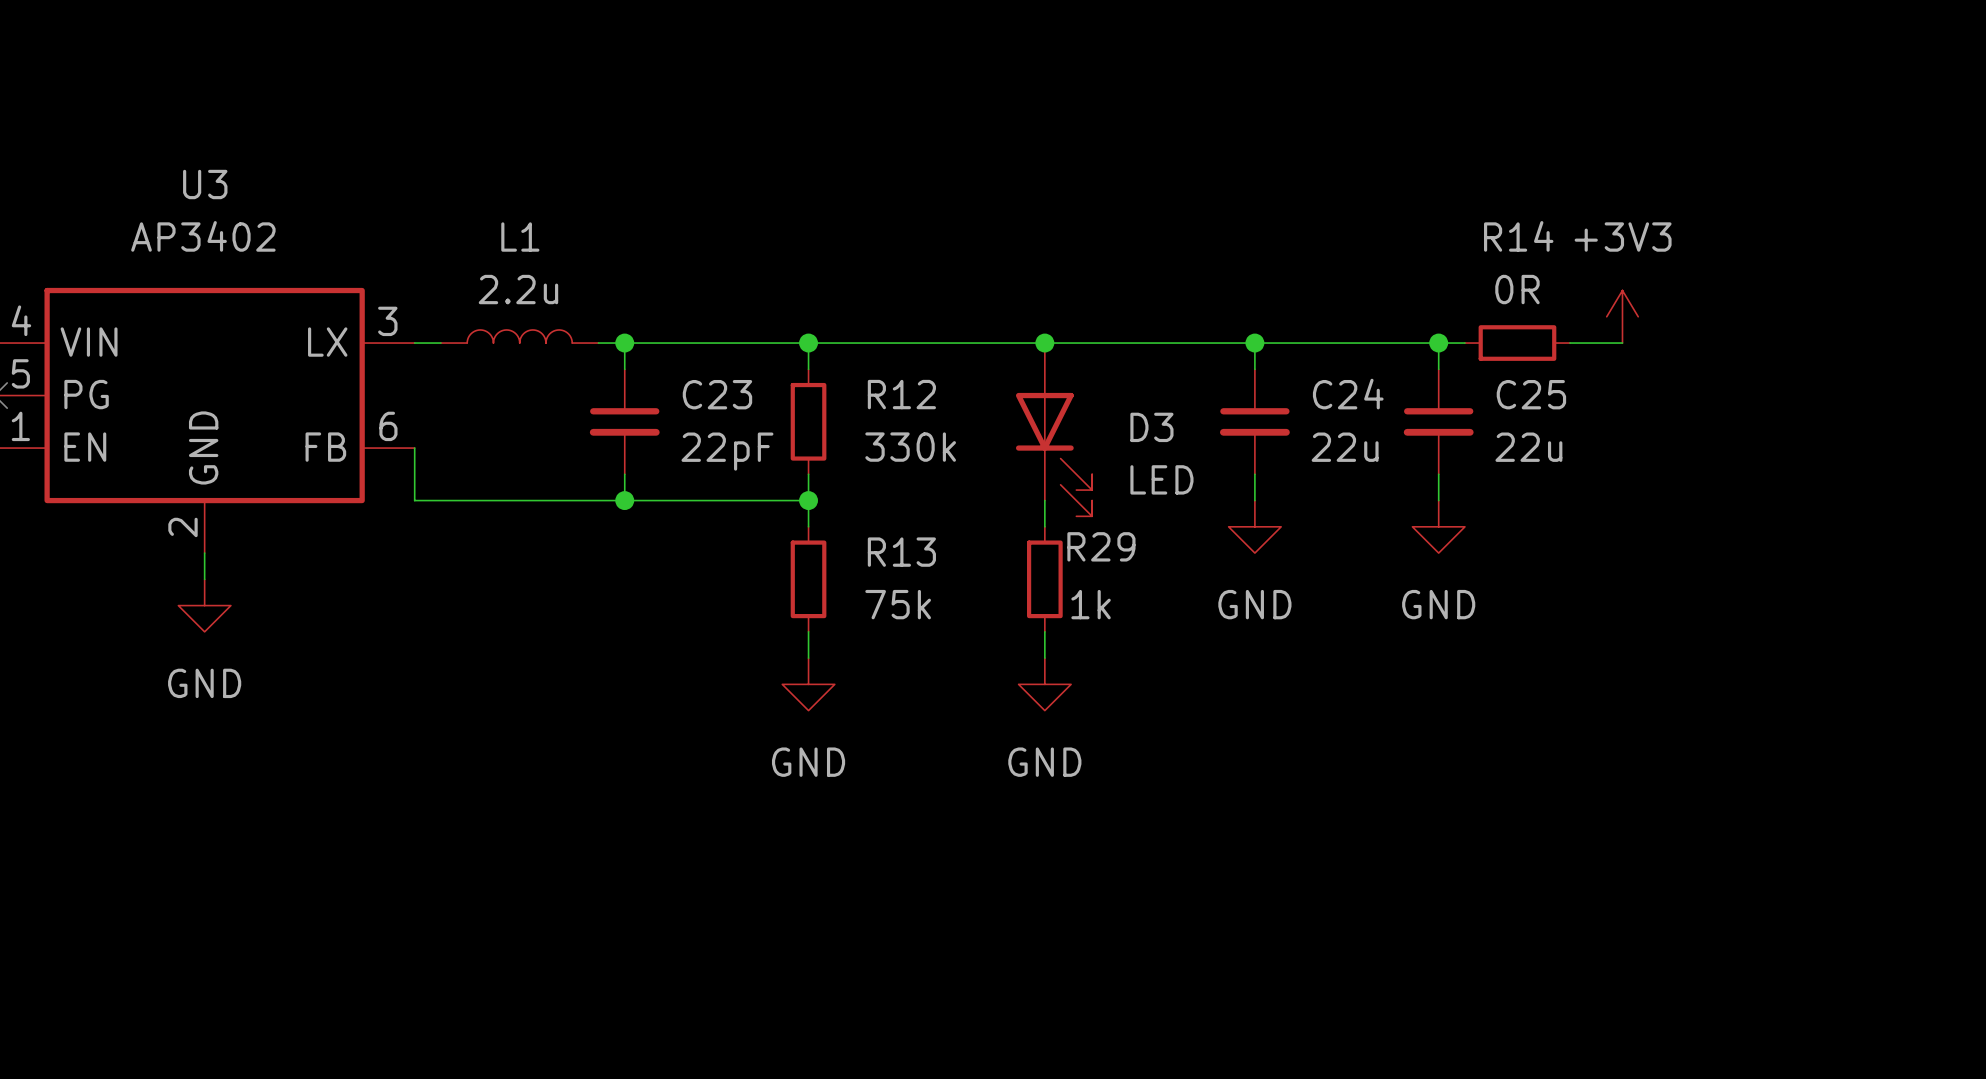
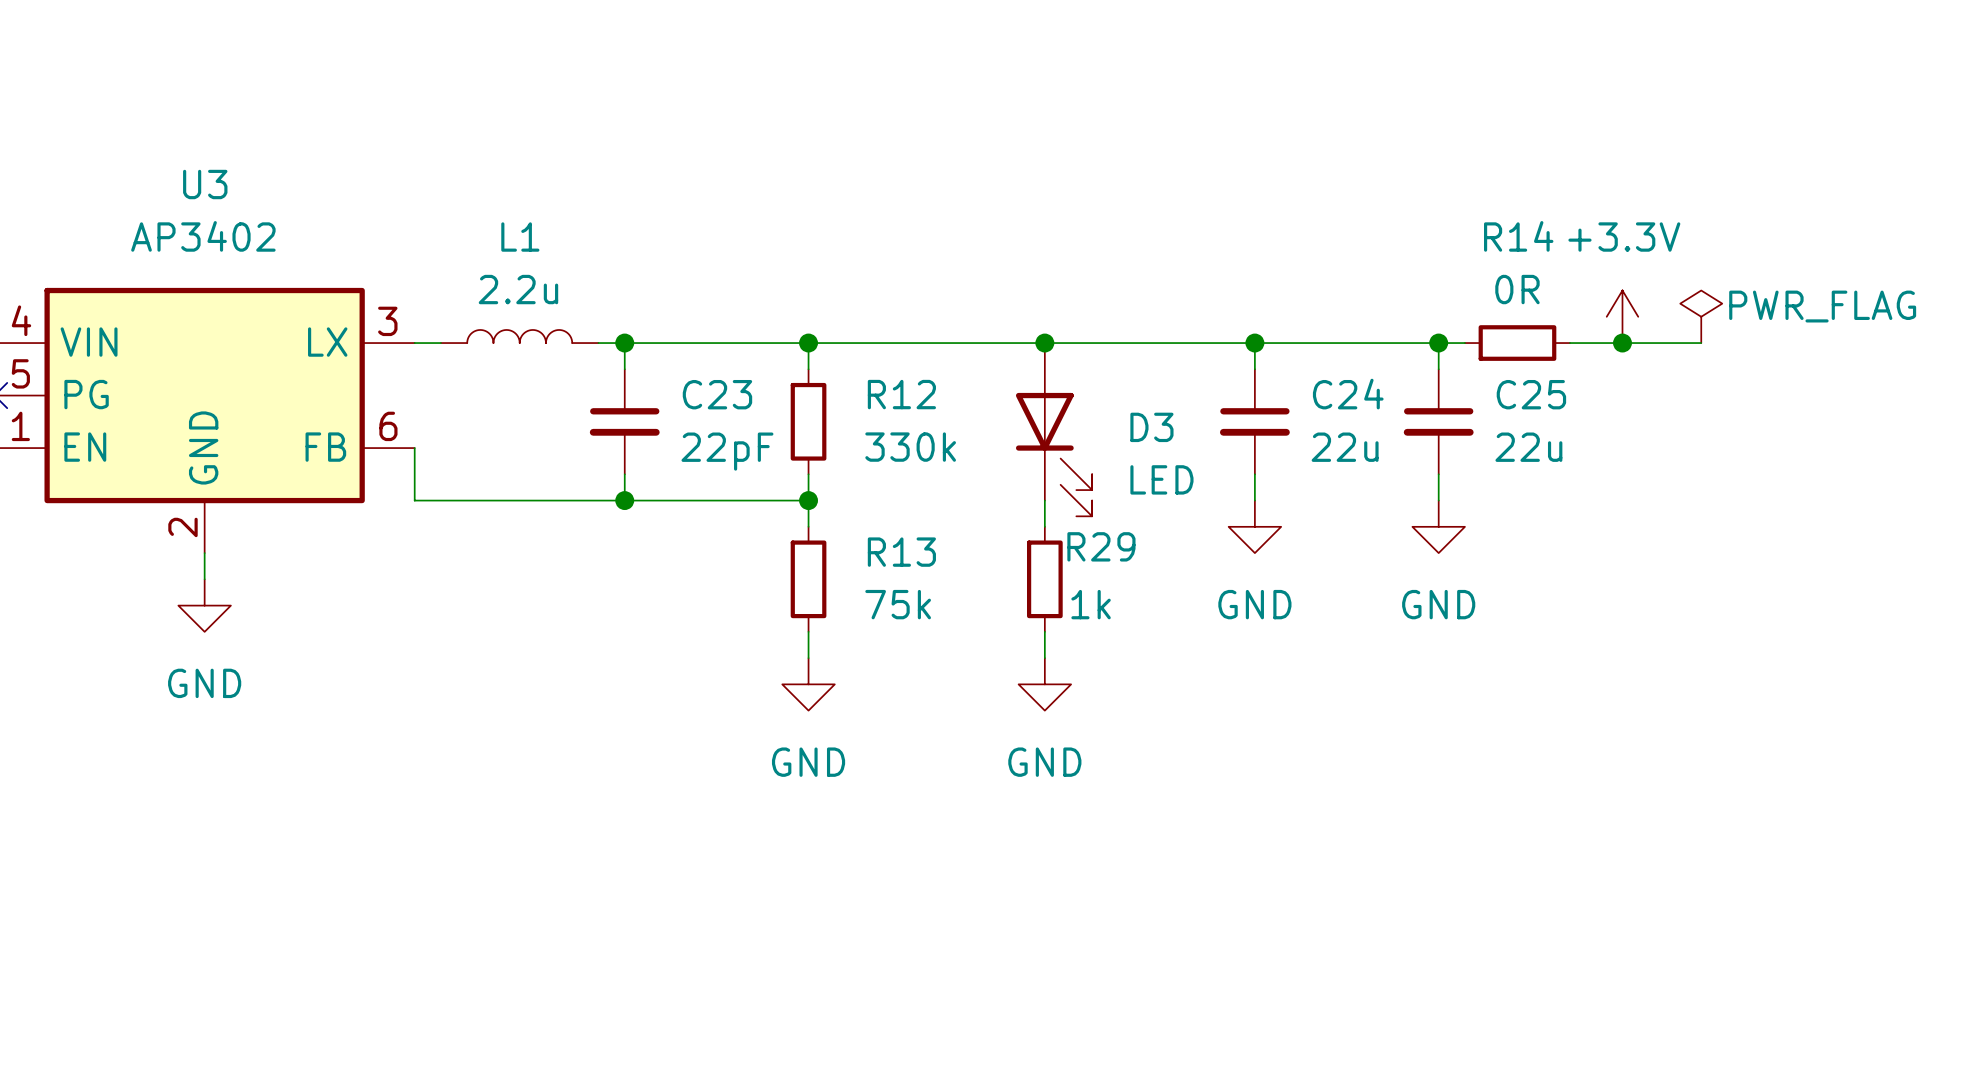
power symbol: +3V3 (1622, 316) -> +3.3V (1622, 316)
power symbol: none -> PWR_FLAG (1701, 316)
wire: none -> (1622, 343) (1701, 343)
junction: none -> (1622, 343)

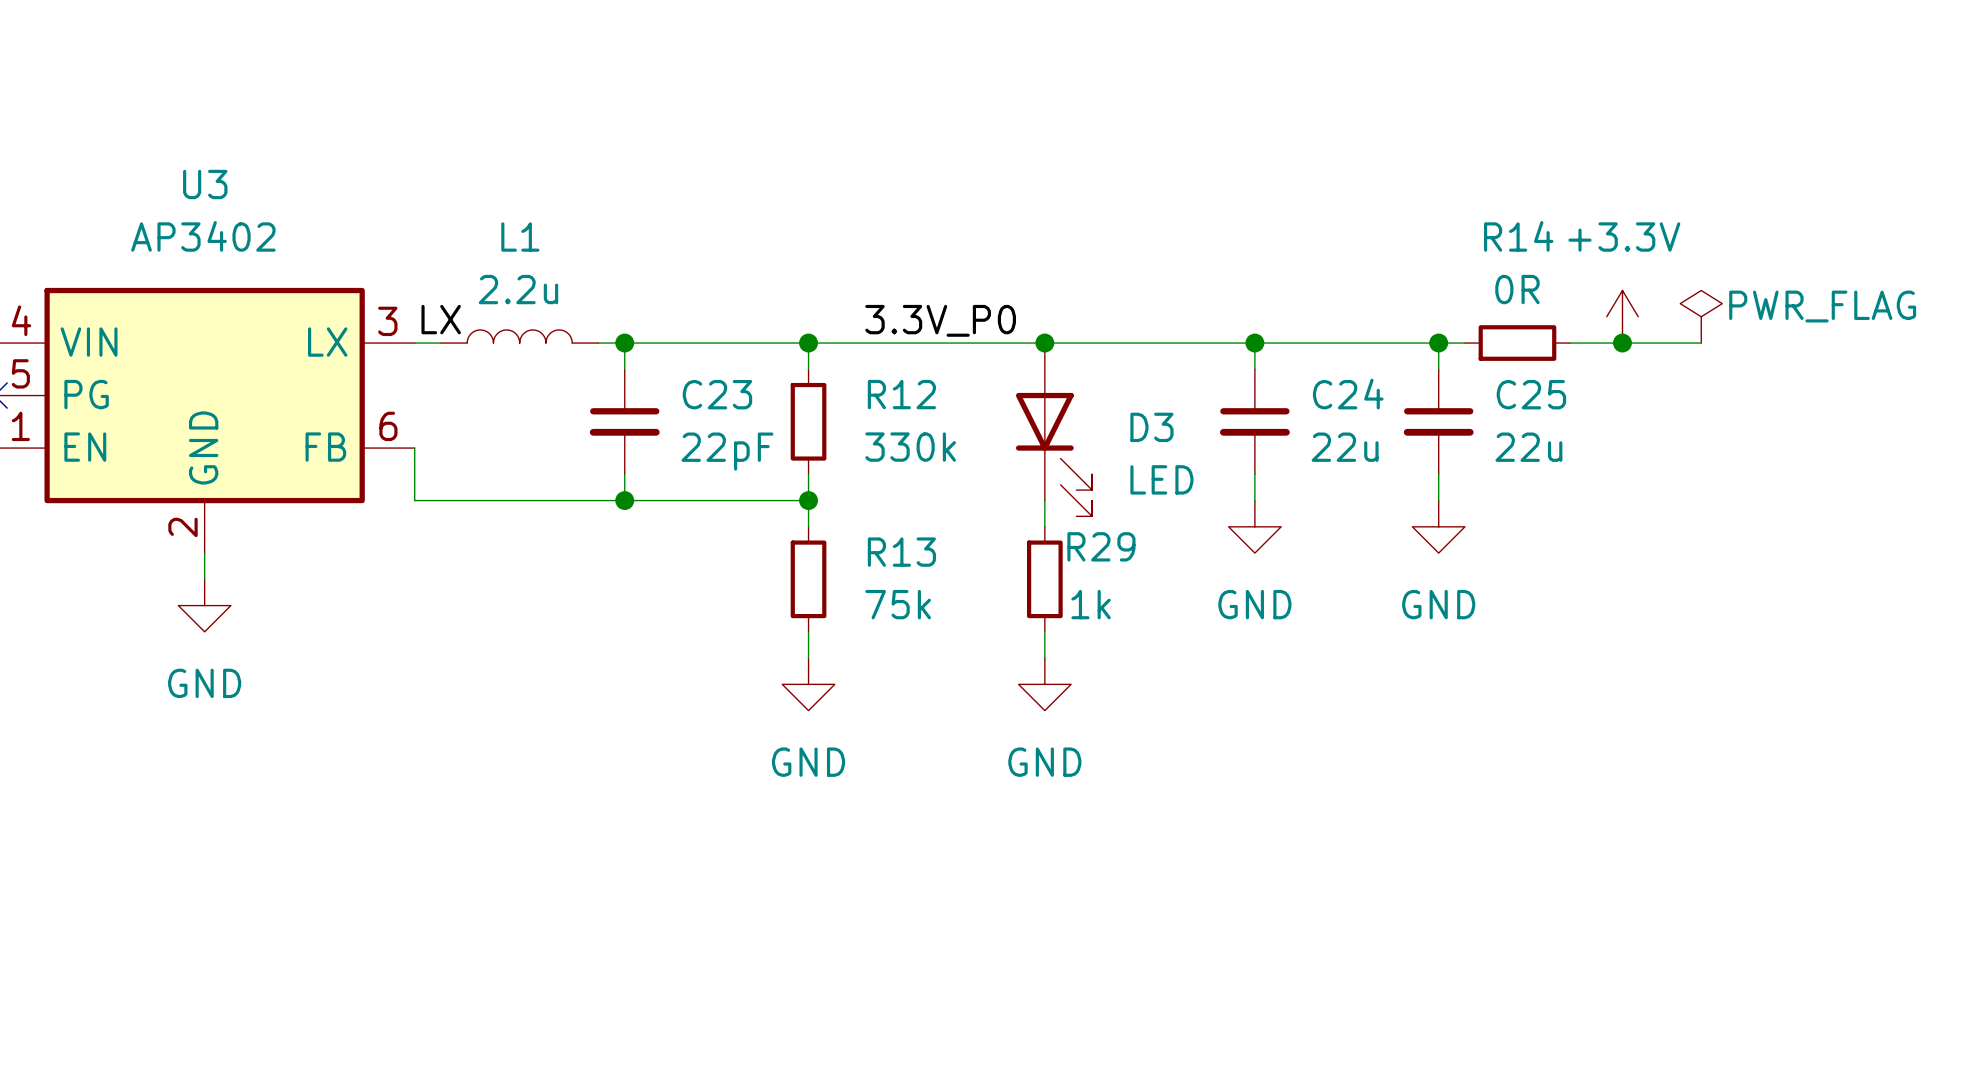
label: none -> LX (441, 319)
label: none -> 3.3V_P0 (940, 320)

